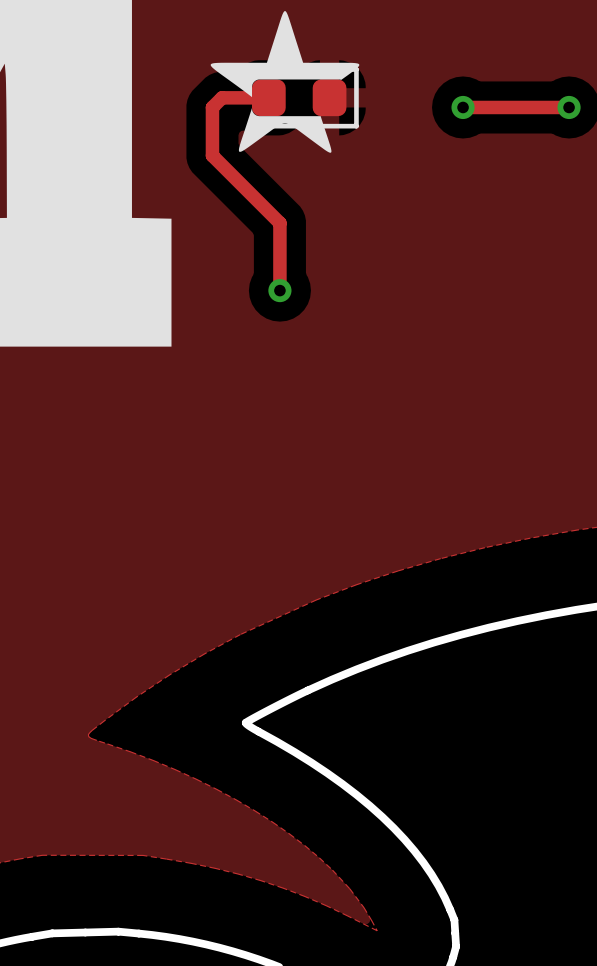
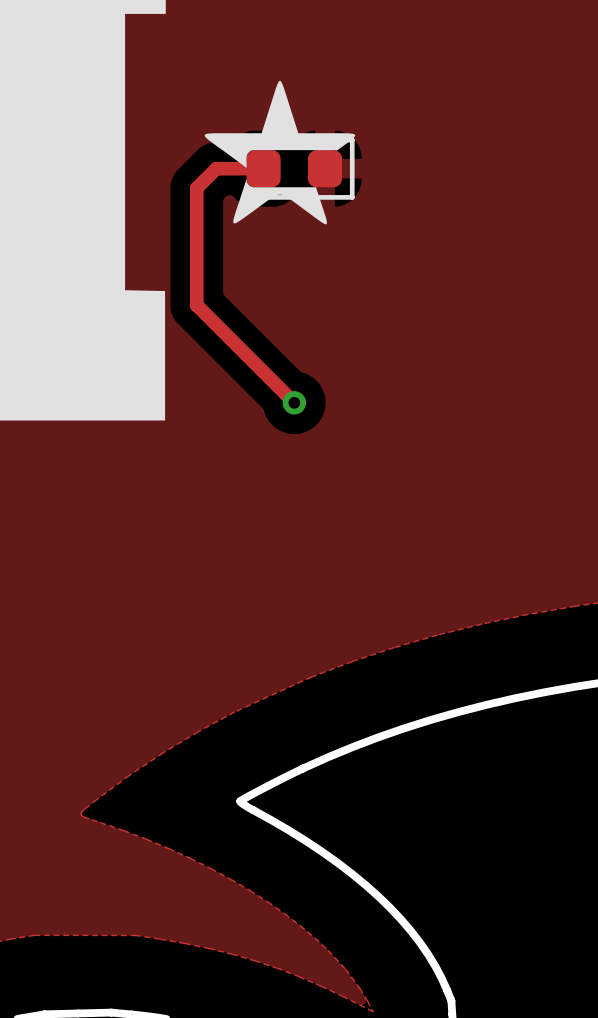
track: (212, 107) (212, 155) (279, 223) (279, 290) -> (206, 178) (196, 188) (196, 305) (294, 402)
track: (463, 107) (569, 107) -> none
via: (463, 107) -> none
via: (569, 107) -> none
via position: (279, 290) -> (294, 402)

